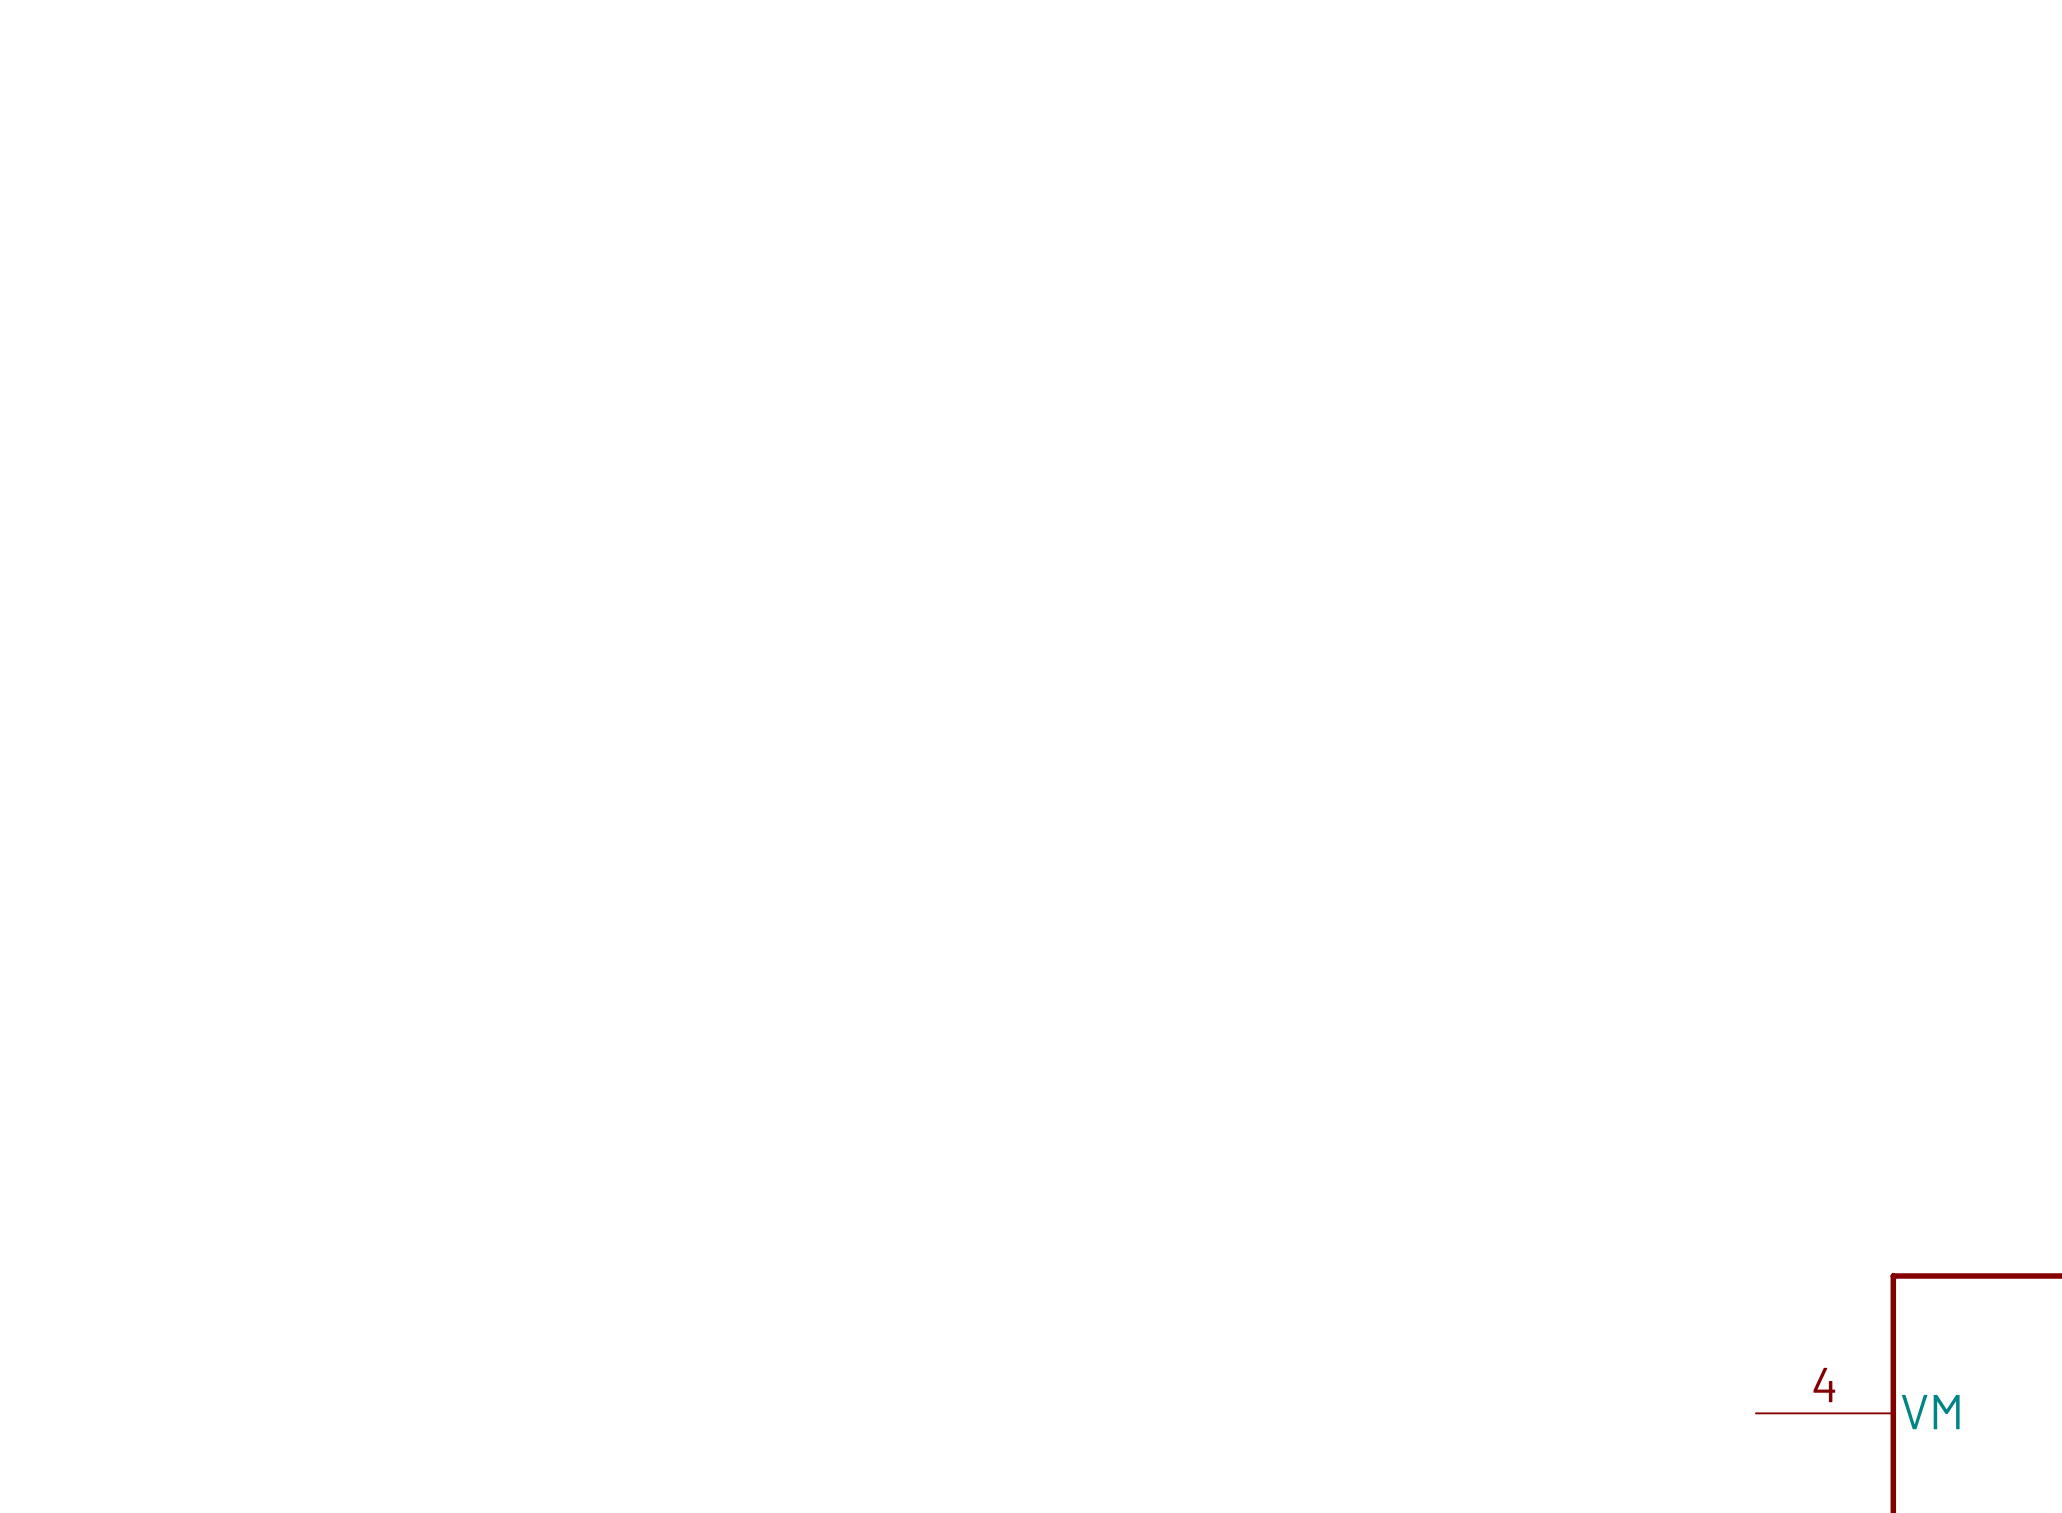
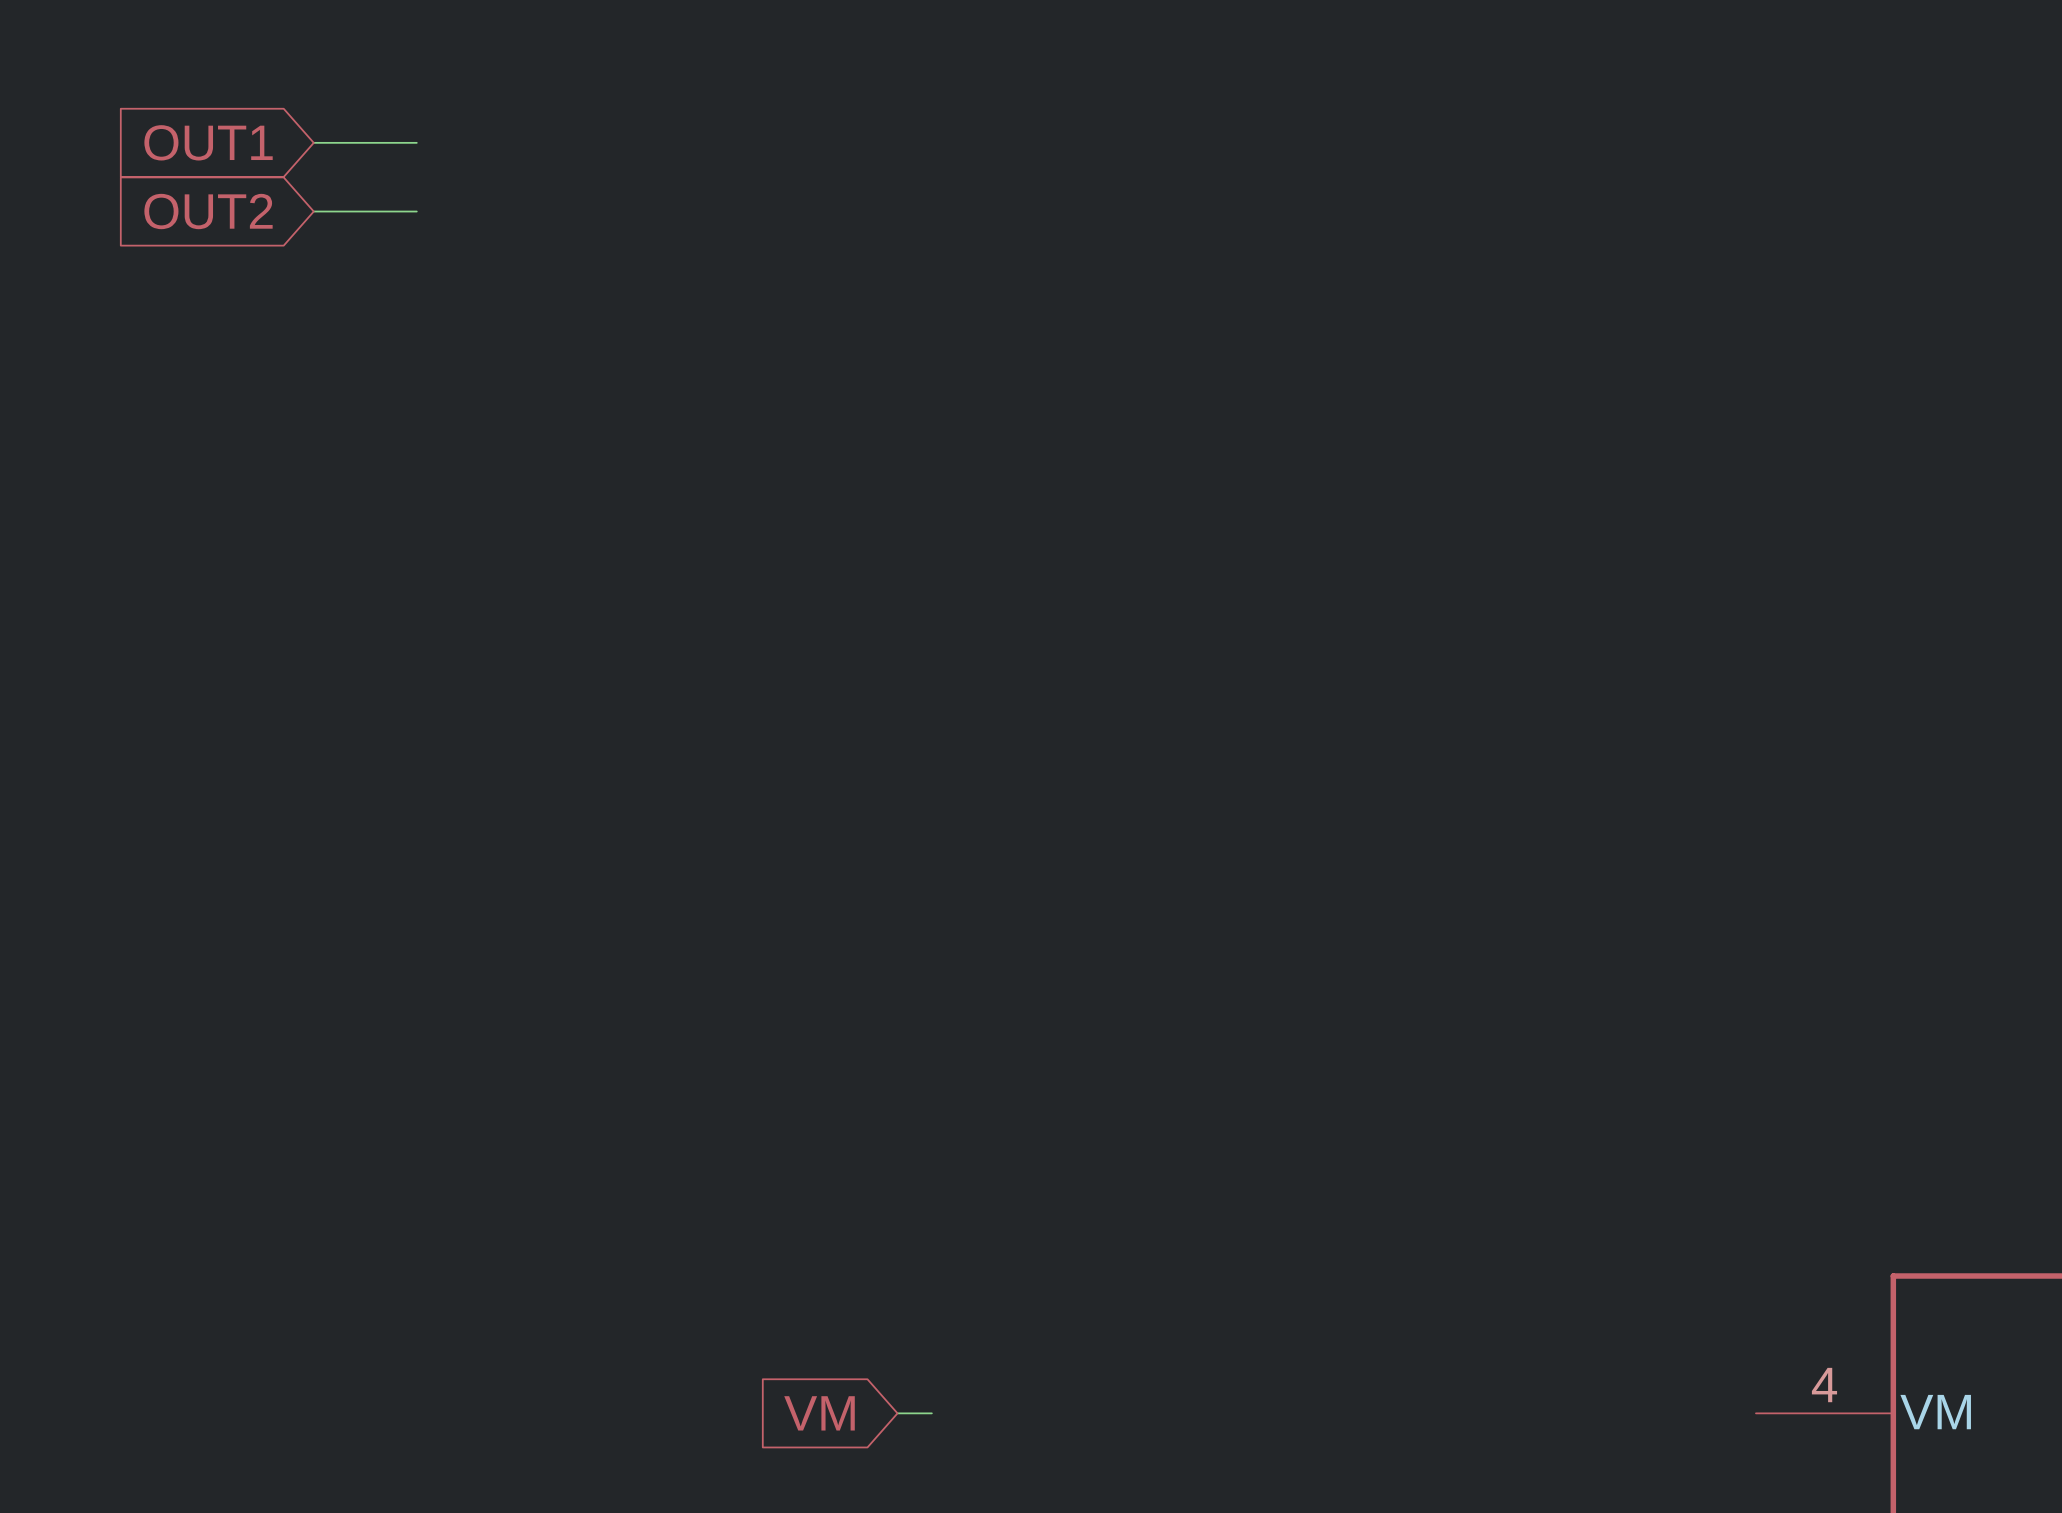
global label: none -> OUT1 (208, 142)
wire: none -> (313, 142) (416, 142)
global label: none -> OUT2 (208, 211)
wire: none -> (313, 211) (416, 211)
global label: none -> VM (819, 1413)
wire: none -> (897, 1413) (931, 1413)

